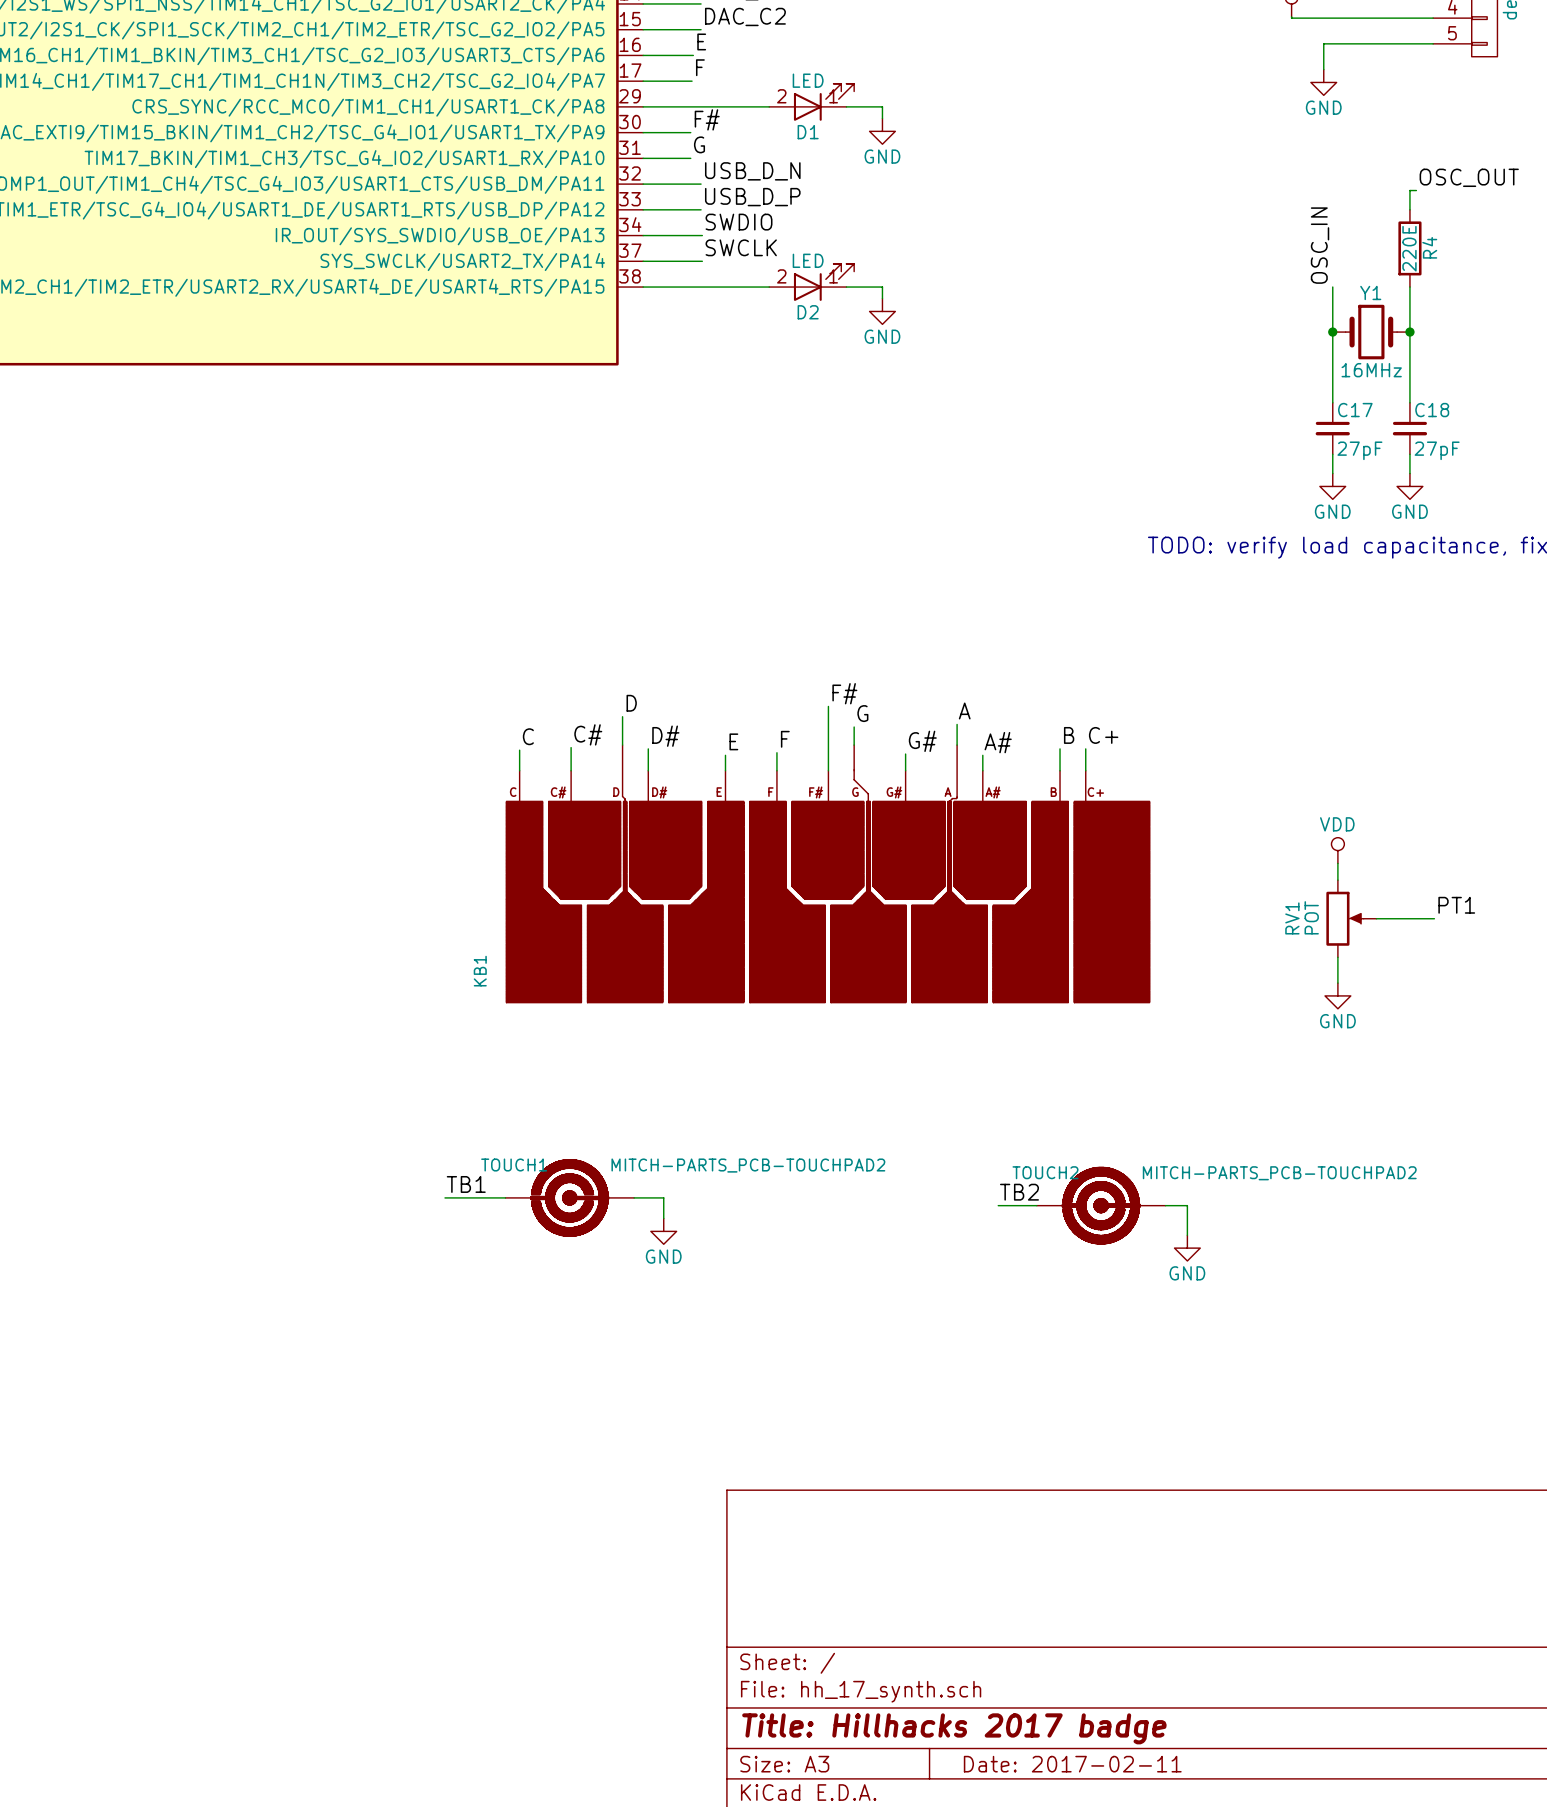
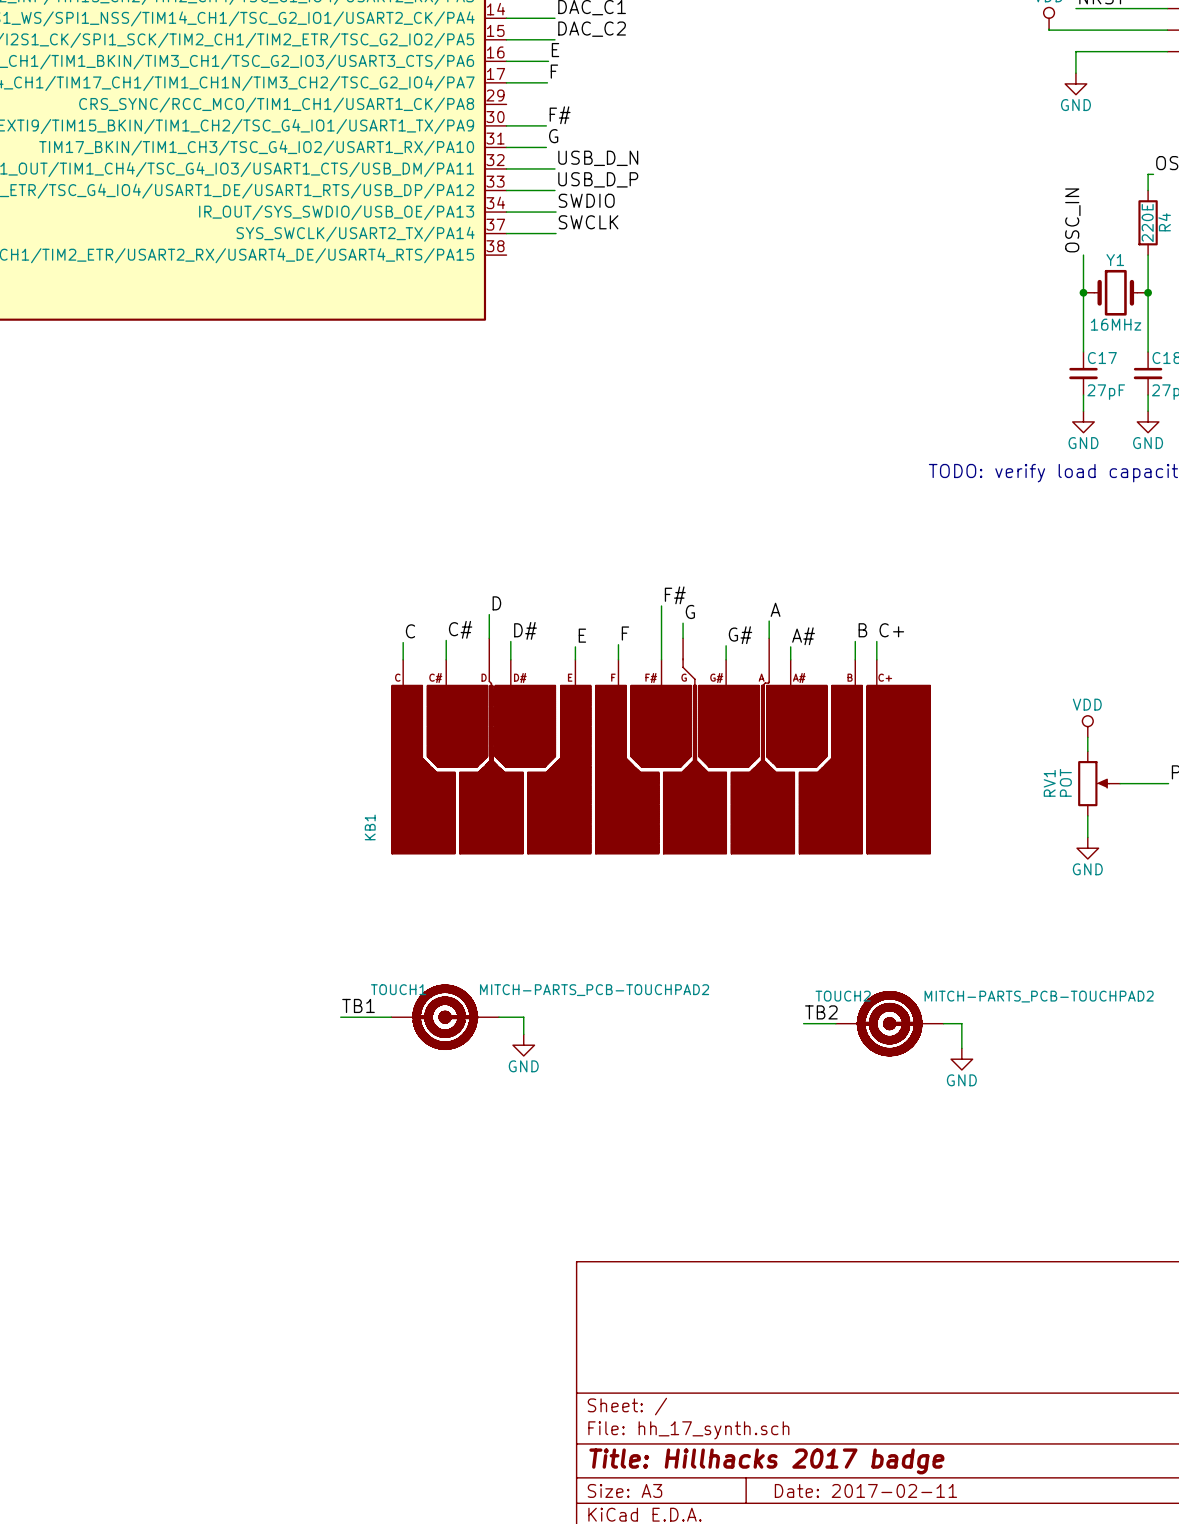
D1: LED (811, 102) -> none
wire: (643, 106) (769, 106) -> none
wire: (846, 106) (882, 106) (882, 118) -> none
power symbol: GND (882, 131) -> none
D2: LED (811, 282) -> none
wire: (643, 287) (769, 287) -> none
wire: (846, 287) (882, 287) (882, 298) -> none
power symbol: GND (882, 311) -> none

